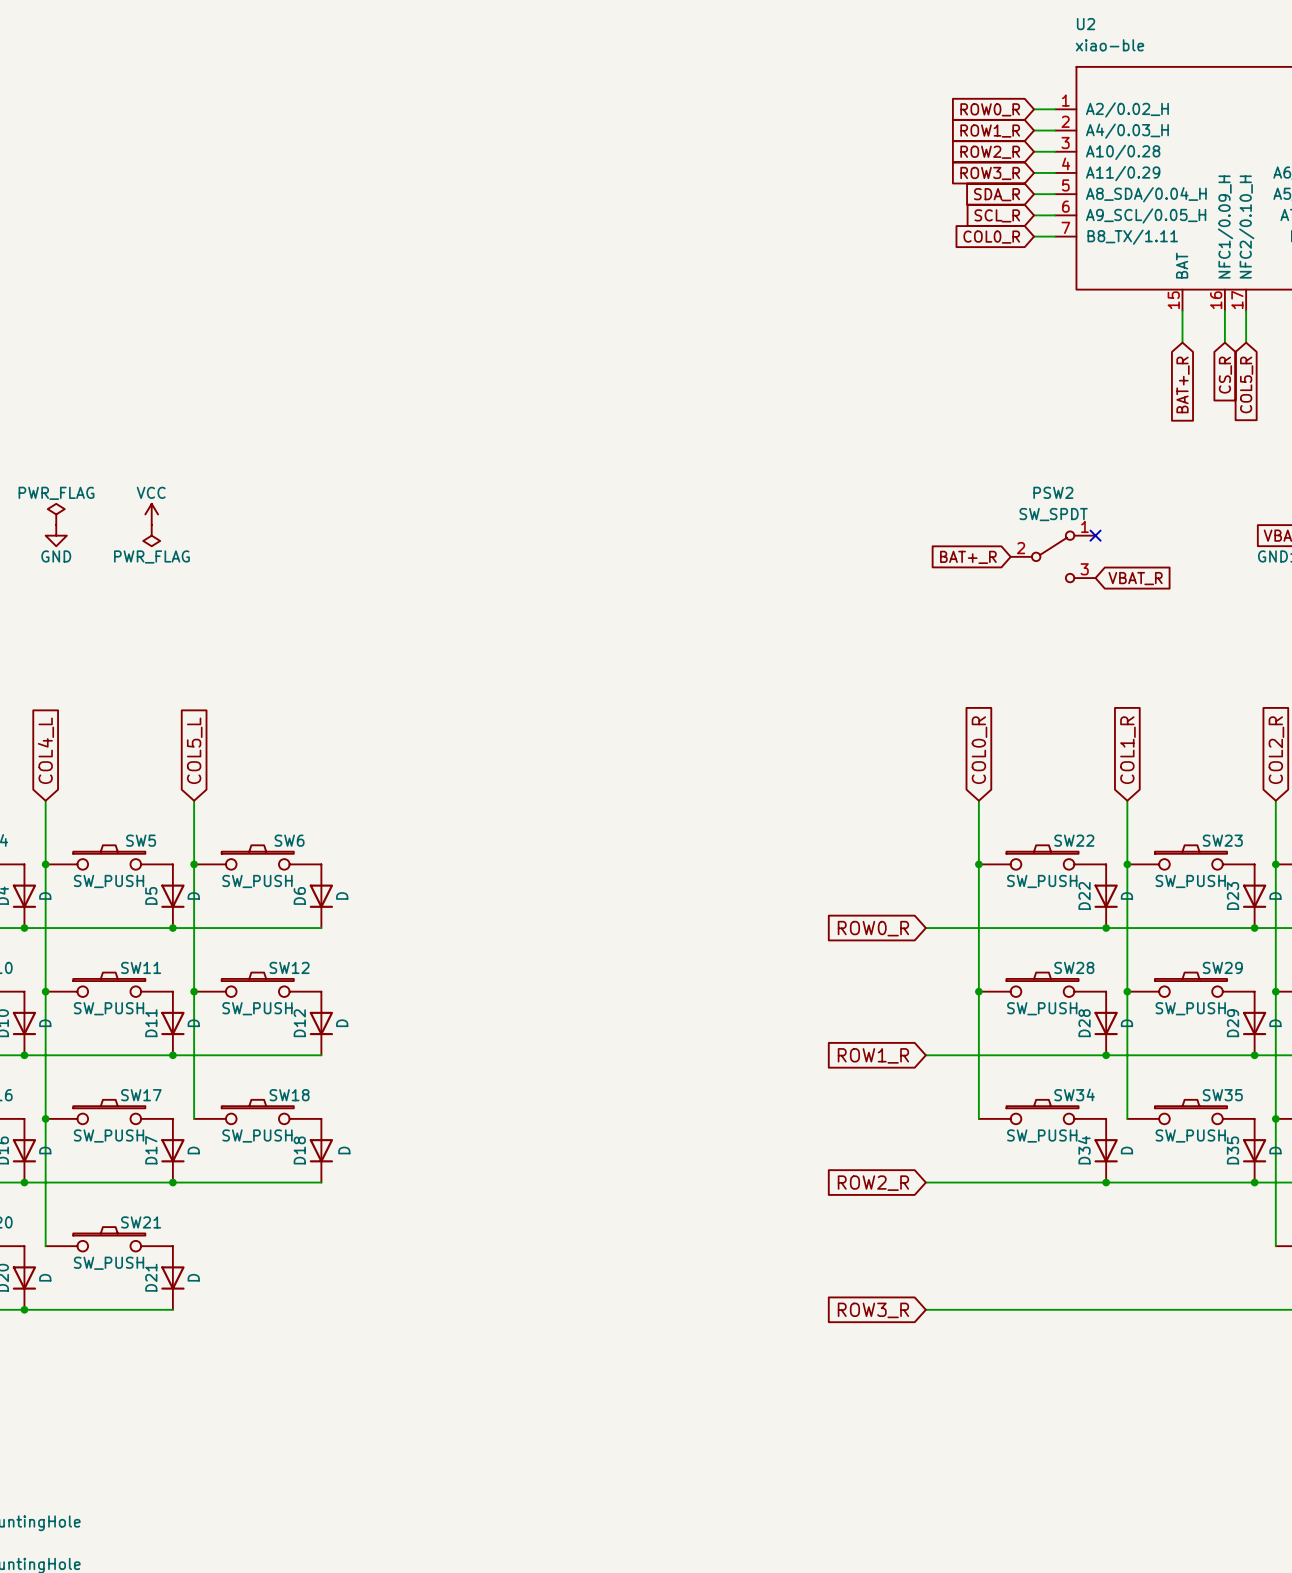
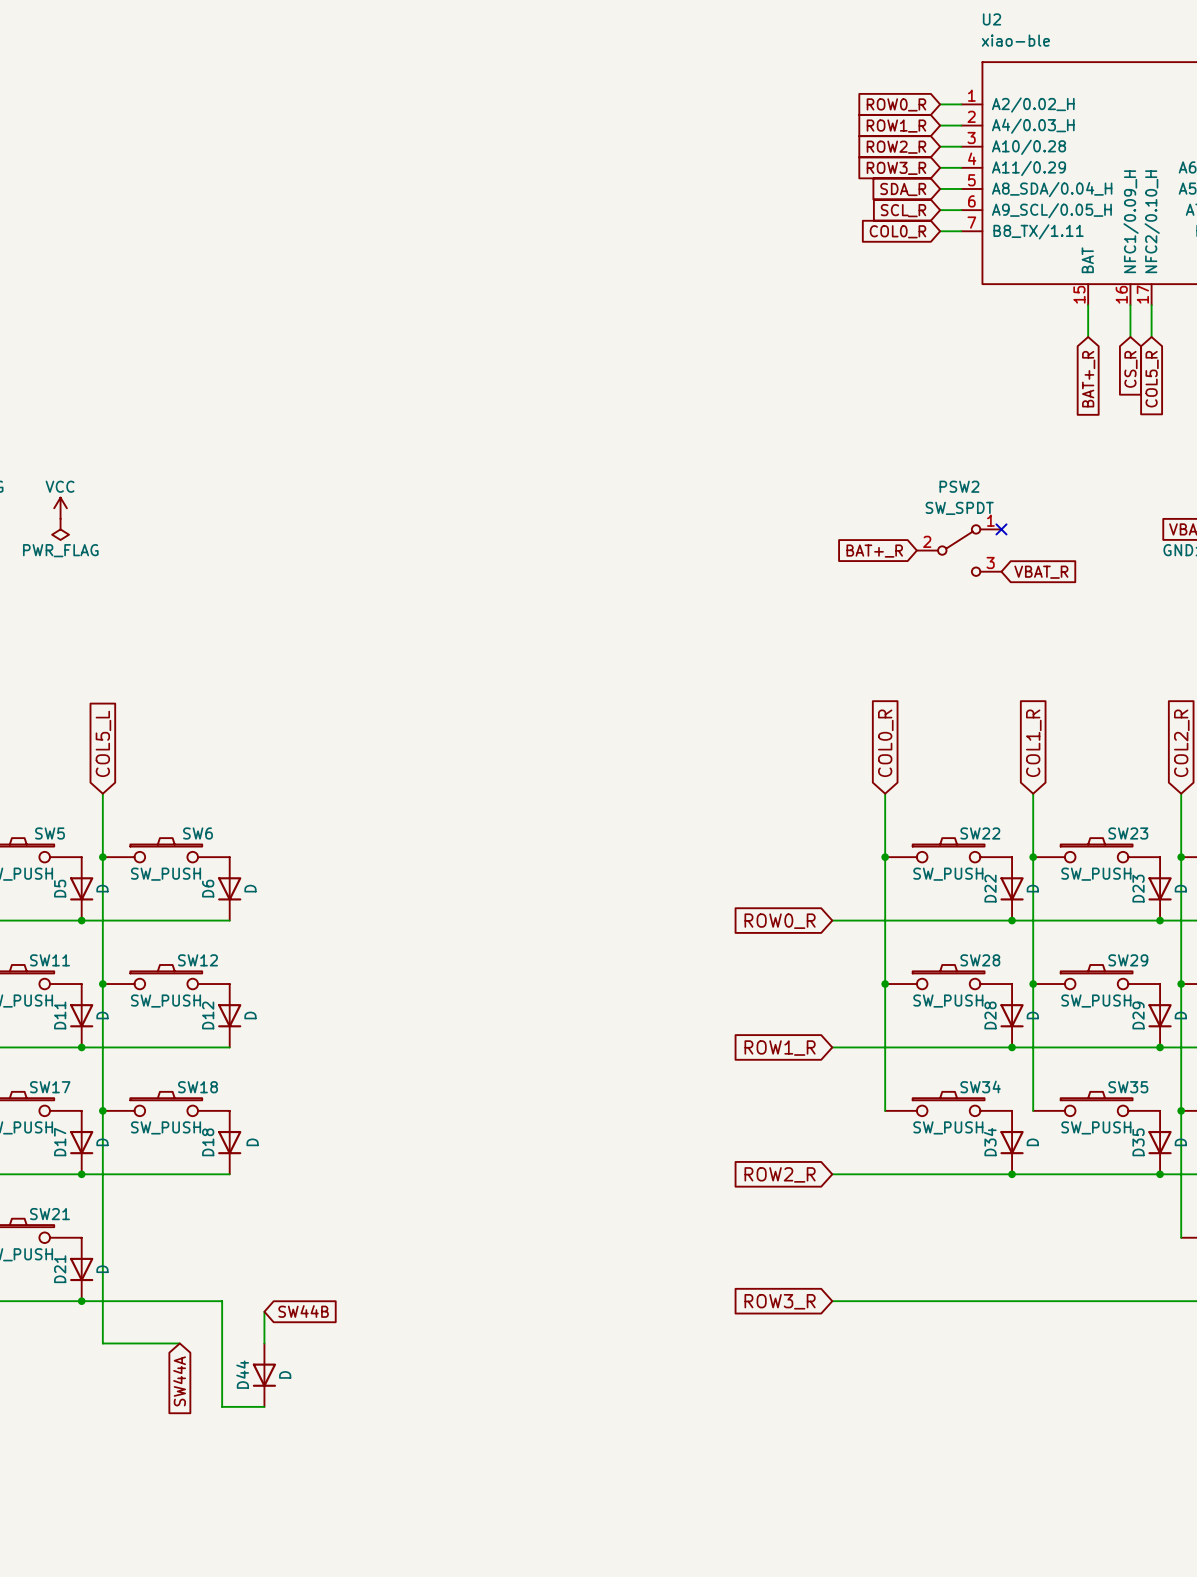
wire: none -> (102, 1110) (102, 1343) (179, 1343)
junction: none -> (102, 1110)
wire: none -> (81, 1301) (222, 1301) (222, 1406) (264, 1406)
junction: none -> (81, 1301)
wire: none -> (264, 1311) (264, 1343)
global label: none -> SW44B (303, 1311)
D44: none -> D (264, 1375)
global label: none -> SW44A (179, 1381)

